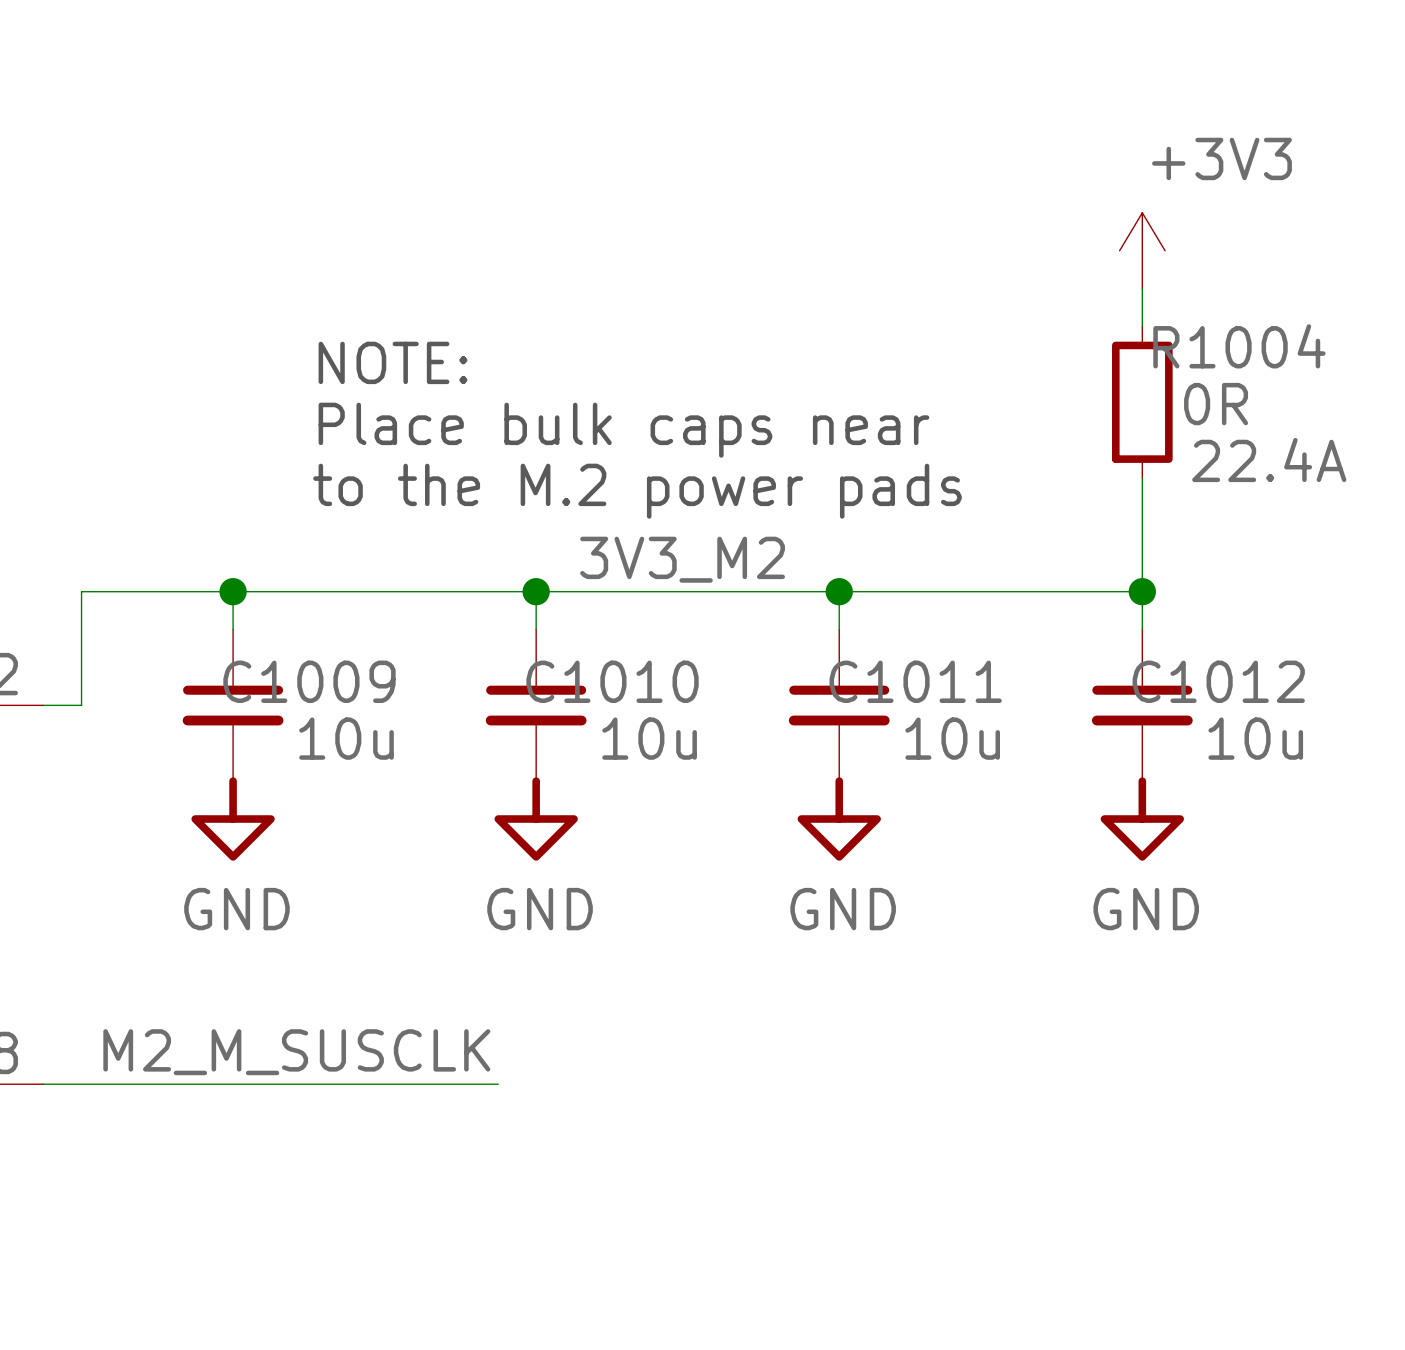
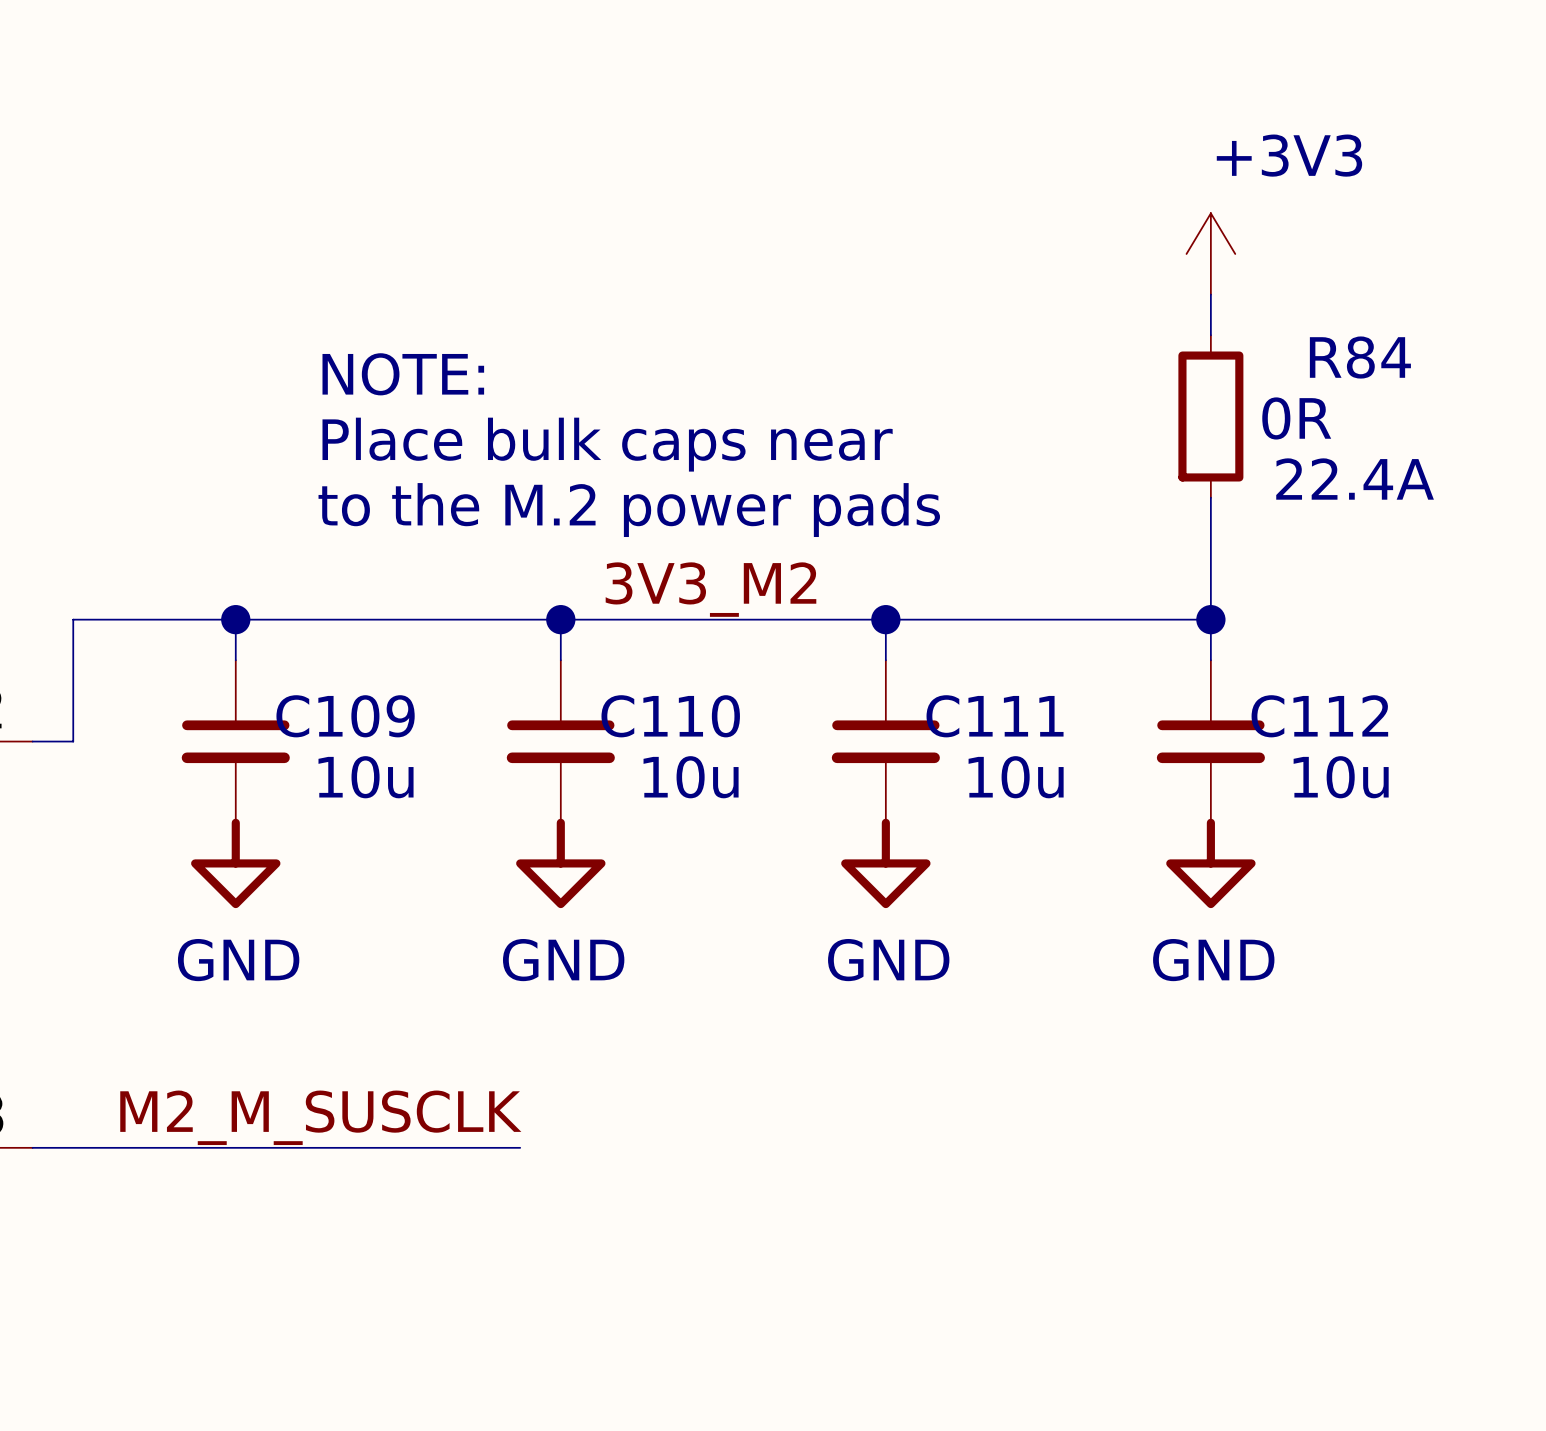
R1004 name: R1004 (1239, 346) -> R84 (1360, 357)
C1009 name: C1009 (309, 681) -> C109 (345, 716)
C1010 name: C1010 (612, 681) -> C110 (670, 716)
C1011 name: C1011 (915, 681) -> C111 (995, 716)
C1012 name: C1012 (1218, 681) -> C112 (1319, 716)

